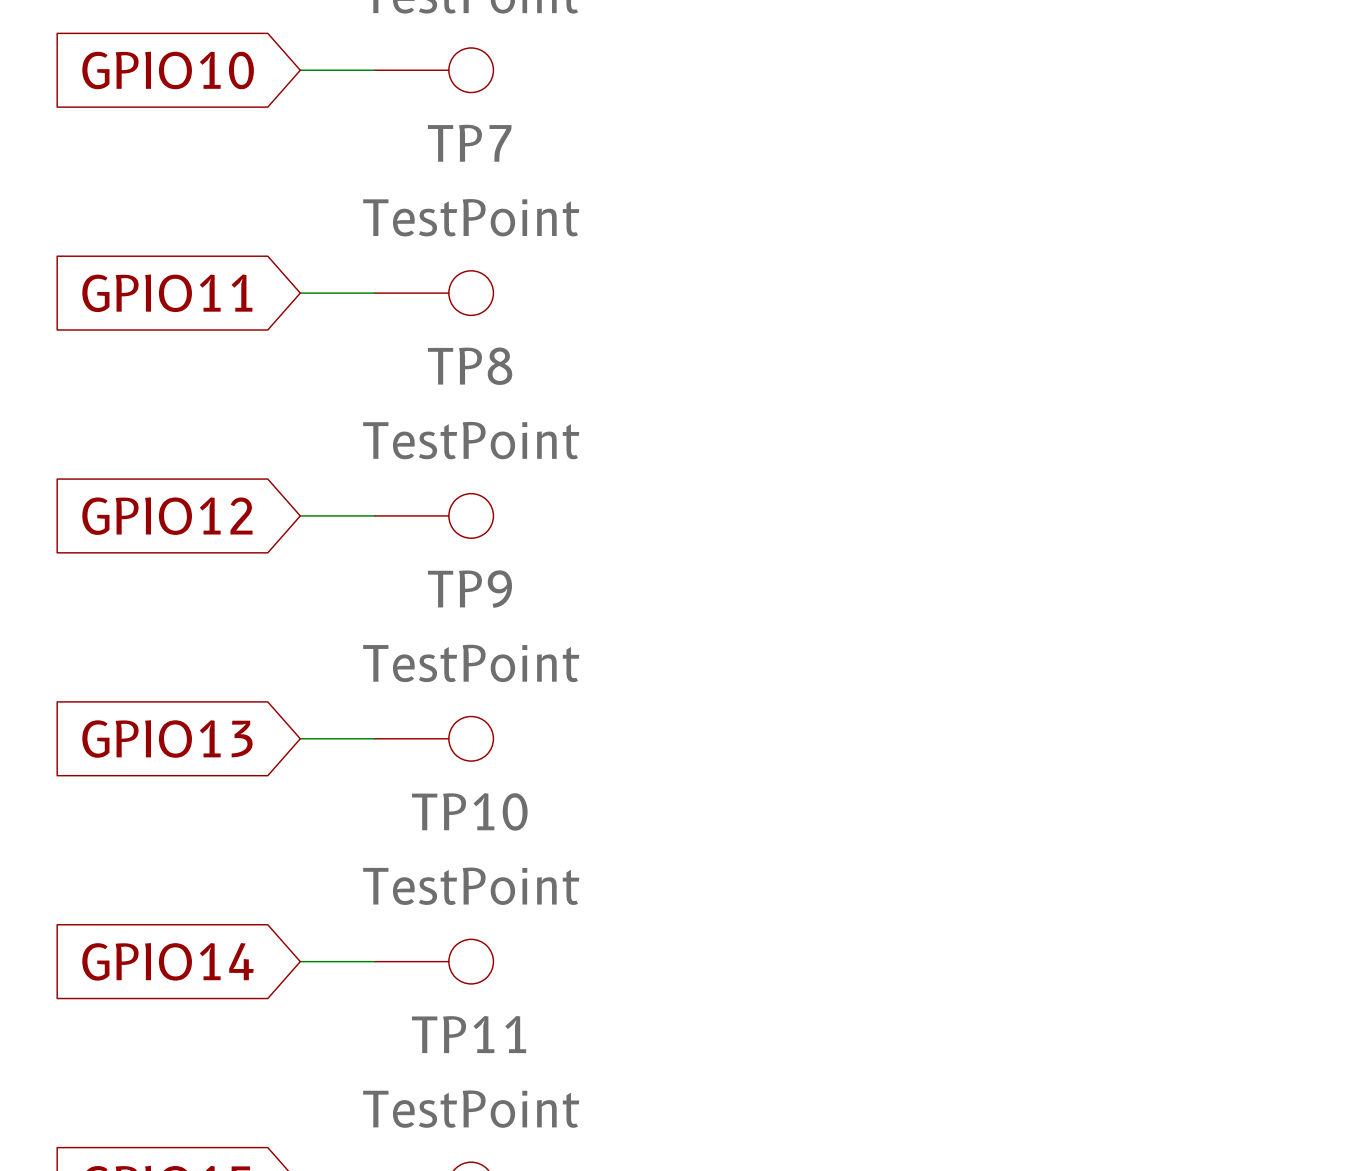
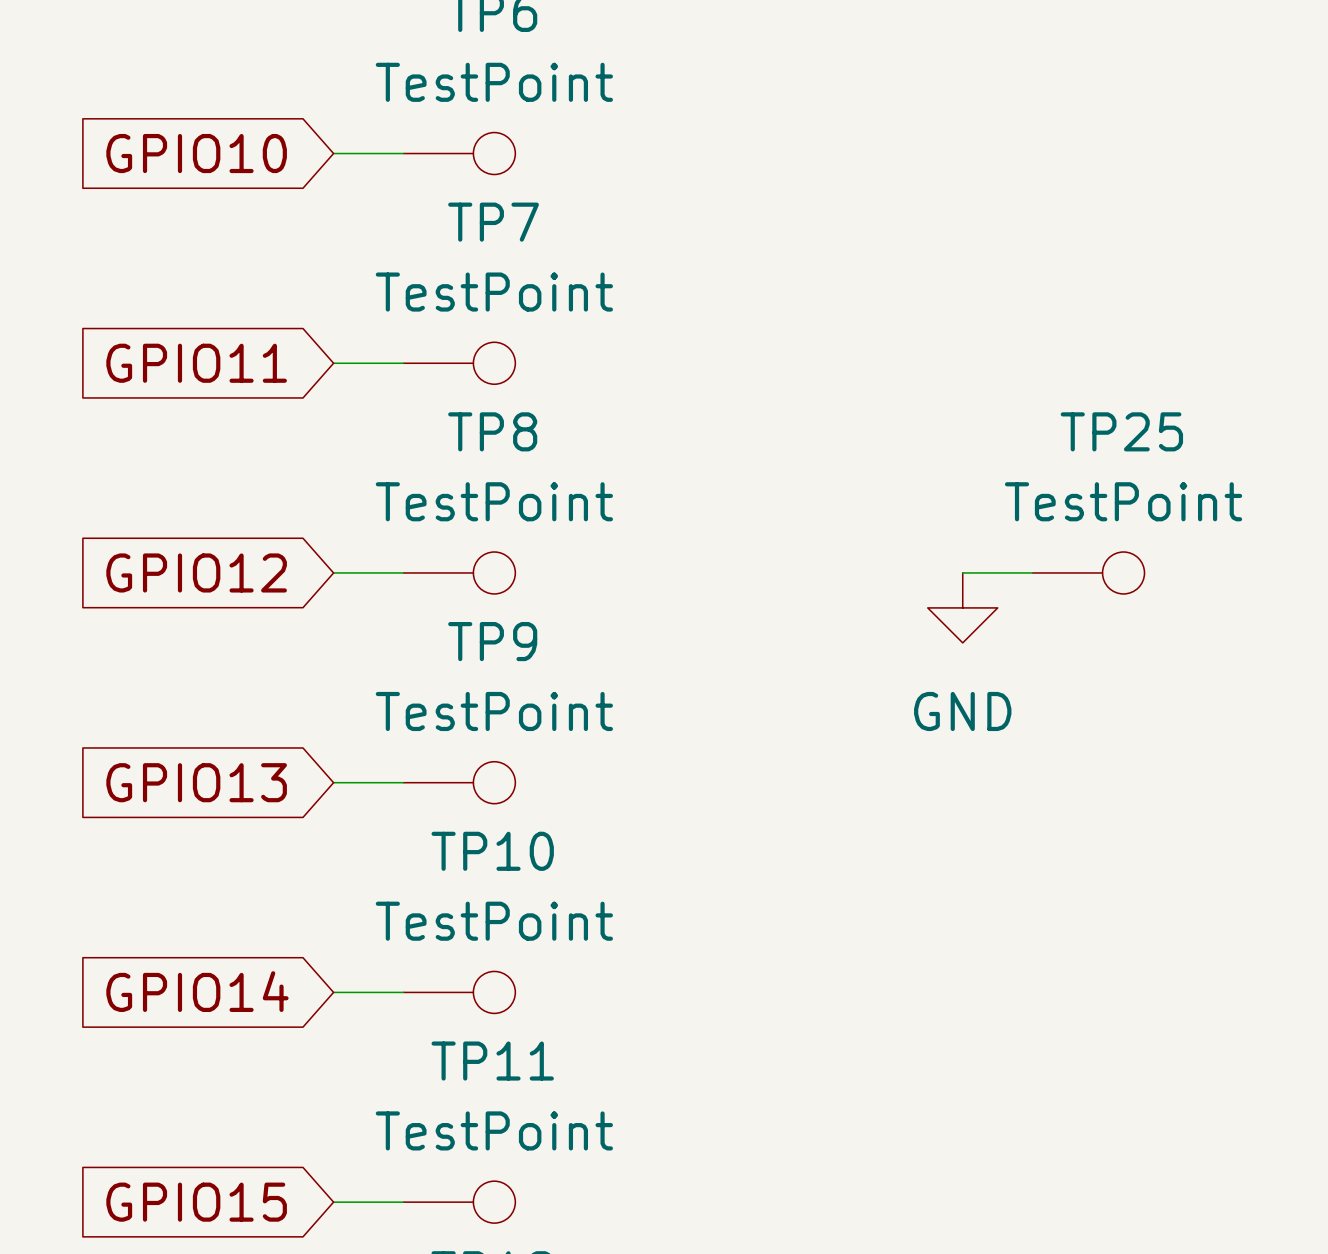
wire: none -> (962, 572) (1032, 572)
TP25: none -> TestPoint (1088, 572)
power symbol: none -> GND (962, 607)

